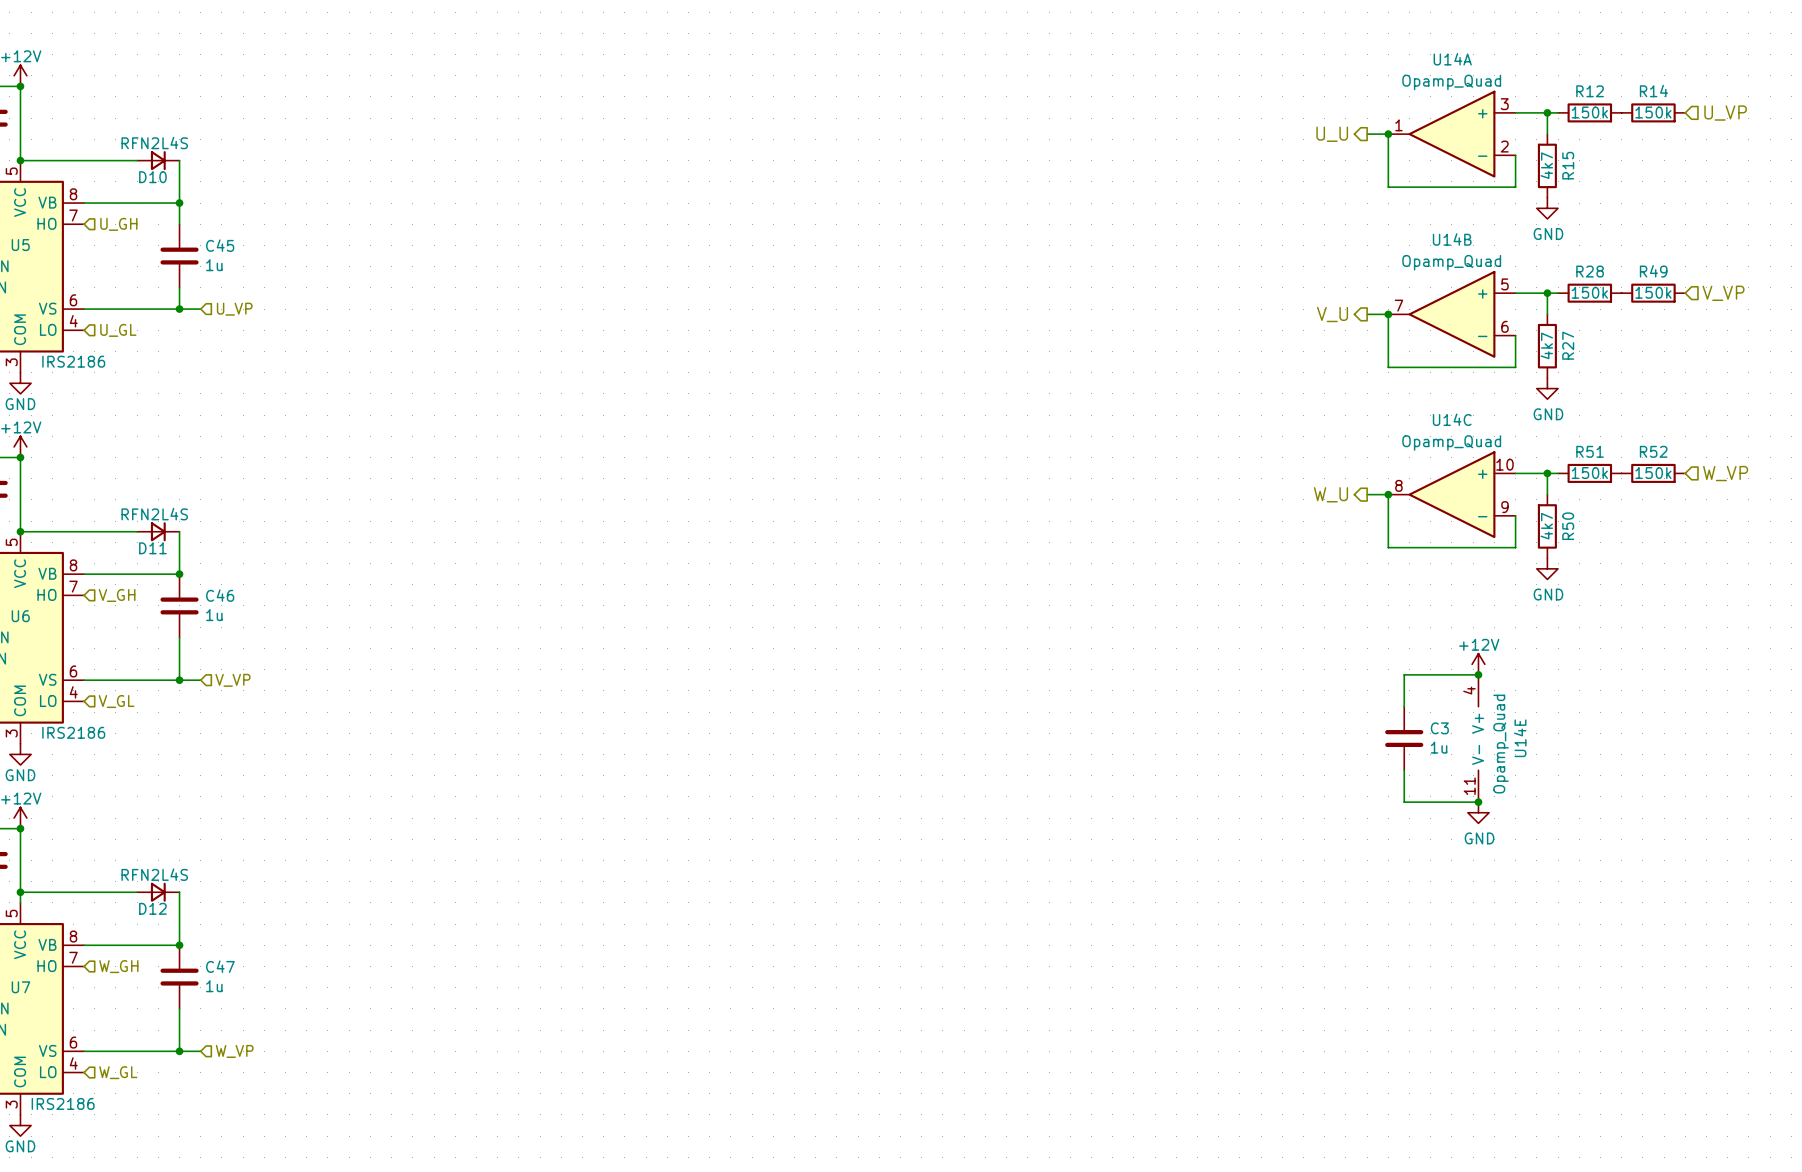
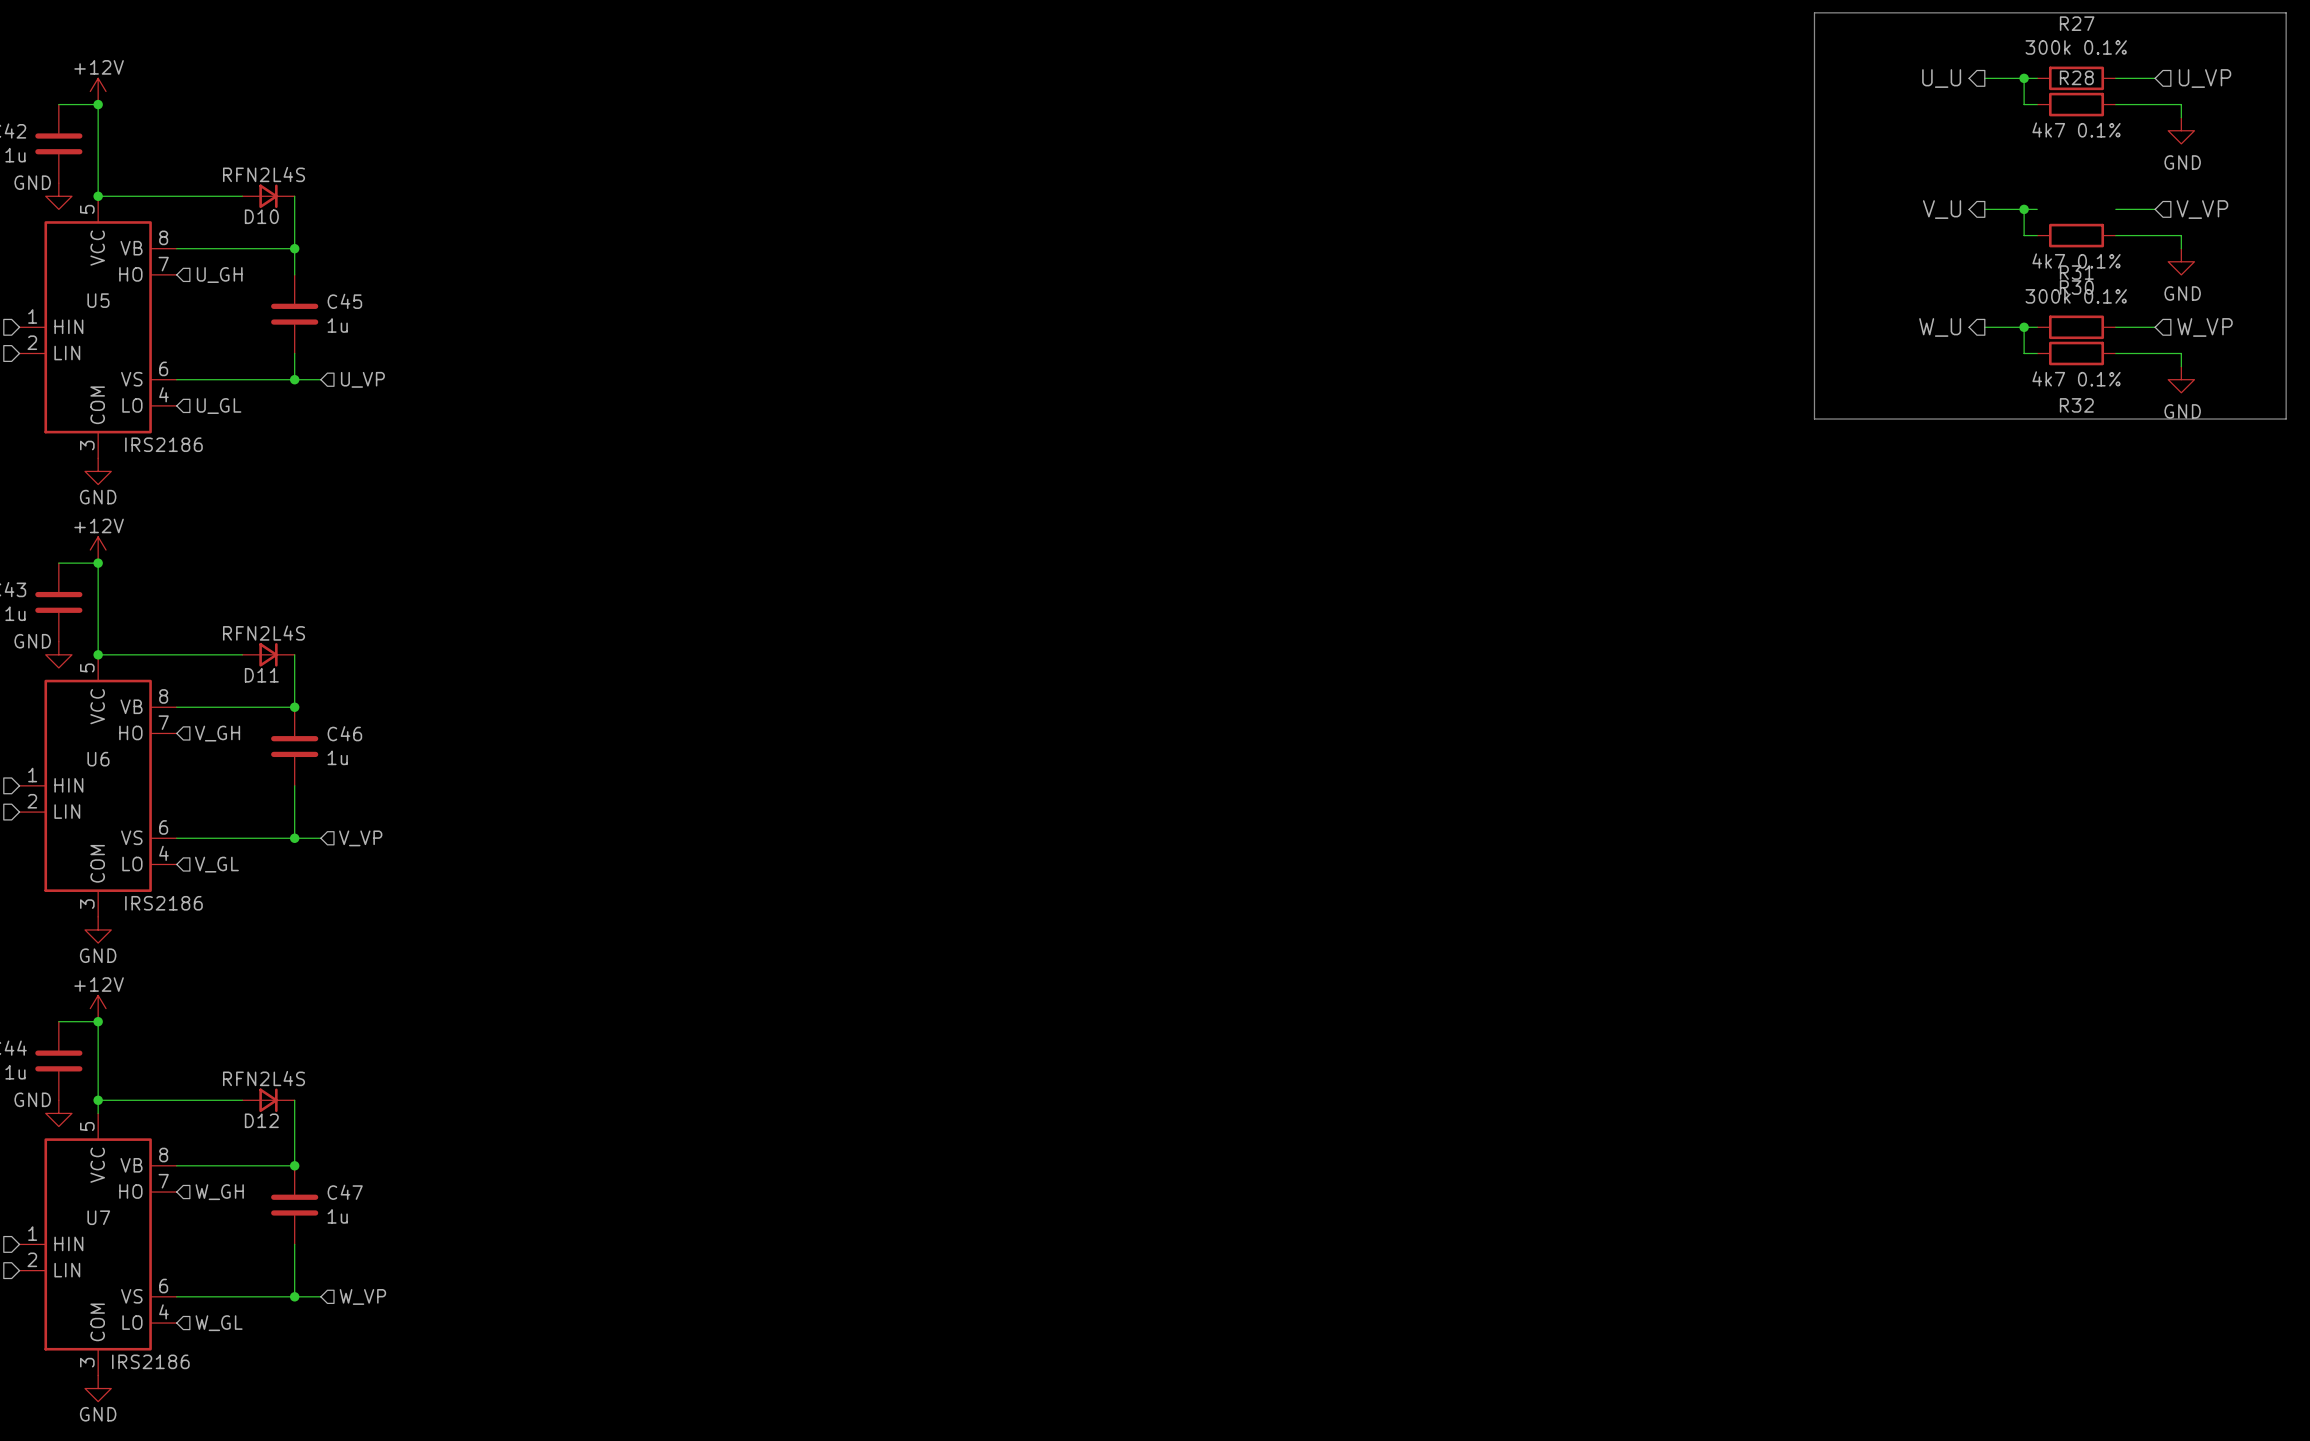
line: none -> (1814, 12) (1814, 419) (2286, 419) (2286, 12) (1814, 12)
wire: none -> (2024, 78) (2024, 104) (2037, 104)
junction: none -> (2024, 78)
wire: none -> (2115, 78) (2155, 78)
wire: none -> (2115, 104) (2181, 104) (2181, 117)
power symbol: none -> GND (2181, 130)
wire: (1515, 112) (1558, 112) -> (1984, 78) (2037, 78)
wire: (1547, 112) (1547, 134) -> none
junction: (1547, 112) -> none
R12: 150k (1589, 112) -> none
R14: 150k (1653, 112) -> none
hierarchical label position: U_VP (1725, 113) -> U_VP (2205, 78)
hierarchical label position: U_U (1332, 134) -> U_U (1941, 78)
wire: (1367, 134) (1388, 134) (1388, 187) (1515, 187) (1515, 155) -> none
junction: (1388, 134) -> none
U14A: Opamp_Quad (1451, 134) -> none
R15: 4k7 (1547, 165) -> none
hierarchical label: none -> V_U (1942, 209)
wire: none -> (1984, 209) (2037, 209)
wire: none -> (2024, 209) (2024, 235) (2037, 235)
junction: none -> (2024, 209)
wire: none -> (2115, 209) (2155, 209)
R30: none -> 4k7 0.1% (2076, 235)
wire: none -> (2115, 235) (2181, 235) (2181, 248)
power symbol: GND (1547, 208) -> none
power symbol: none -> GND (2181, 261)
hierarchical label: none -> W_U (1940, 327)
wire: none -> (2024, 327) (2024, 353) (2037, 353)
R31: none -> 300k 0.1% (2076, 327)
wire: none -> (2115, 327) (2155, 327)
R32: none -> 4k7 0.1% (2076, 353)
wire: none -> (2115, 353) (2181, 353) (2181, 366)
R28 value: 150k (1589, 292) -> 4k7 0.1% (2076, 129)
wire: (1515, 293) (1558, 293) -> (1984, 327) (2037, 327)
wire: (1547, 293) (1547, 314) -> none
junction position: (1547, 293) -> (2024, 327)
R28 position: (1589, 293) -> (2076, 104)
R49: 150k (1653, 293) -> none
hierarchical label position: V_VP (1723, 293) -> V_VP (2202, 209)
power symbol: none -> GND (2181, 379)
hierarchical label: V_U (1332, 314) -> none
wire: (1367, 314) (1388, 314) (1388, 367) (1515, 367) (1515, 335) -> none
junction: (1388, 314) -> none
U14B: Opamp_Quad (1451, 314) -> none
R27 value: 4k7 (1546, 345) -> 300k 0.1% (2076, 47)
R27 name position: R27 (1568, 345) -> R27 (2077, 23)
R27 rotation: 0° (1547, 346) -> 90° clockwise (2076, 78)
R27 position: (1547, 346) -> (2076, 78)
power symbol: GND (1547, 388) -> none
wire: (1515, 473) (1558, 473) -> none
wire: (1547, 473) (1547, 494) -> none
junction: (1547, 473) -> none
R51: 150k (1589, 473) -> none
R52: 150k (1653, 473) -> none
hierarchical label position: W_VP (1725, 473) -> W_VP (2205, 327)
hierarchical label: W_U (1331, 494) -> none
wire: (1367, 494) (1388, 494) (1388, 547) (1515, 547) (1515, 515) -> none
junction: (1388, 494) -> none
U14C: Opamp_Quad (1451, 494) -> none
R50: 4k7 (1547, 526) -> none
power symbol: GND (1547, 568) -> none
power symbol: +12V (1478, 664) -> none
wire: (1478, 674) (1404, 674) (1404, 706) -> none
junction: (1478, 674) -> none
C3: 1u (1404, 738) -> none
U14E: Opamp_Quad (1478, 738) -> none
wire: (1404, 770) (1404, 802) (1478, 802) -> none
junction: (1478, 802) -> none
power symbol: GND (1478, 812) -> none

